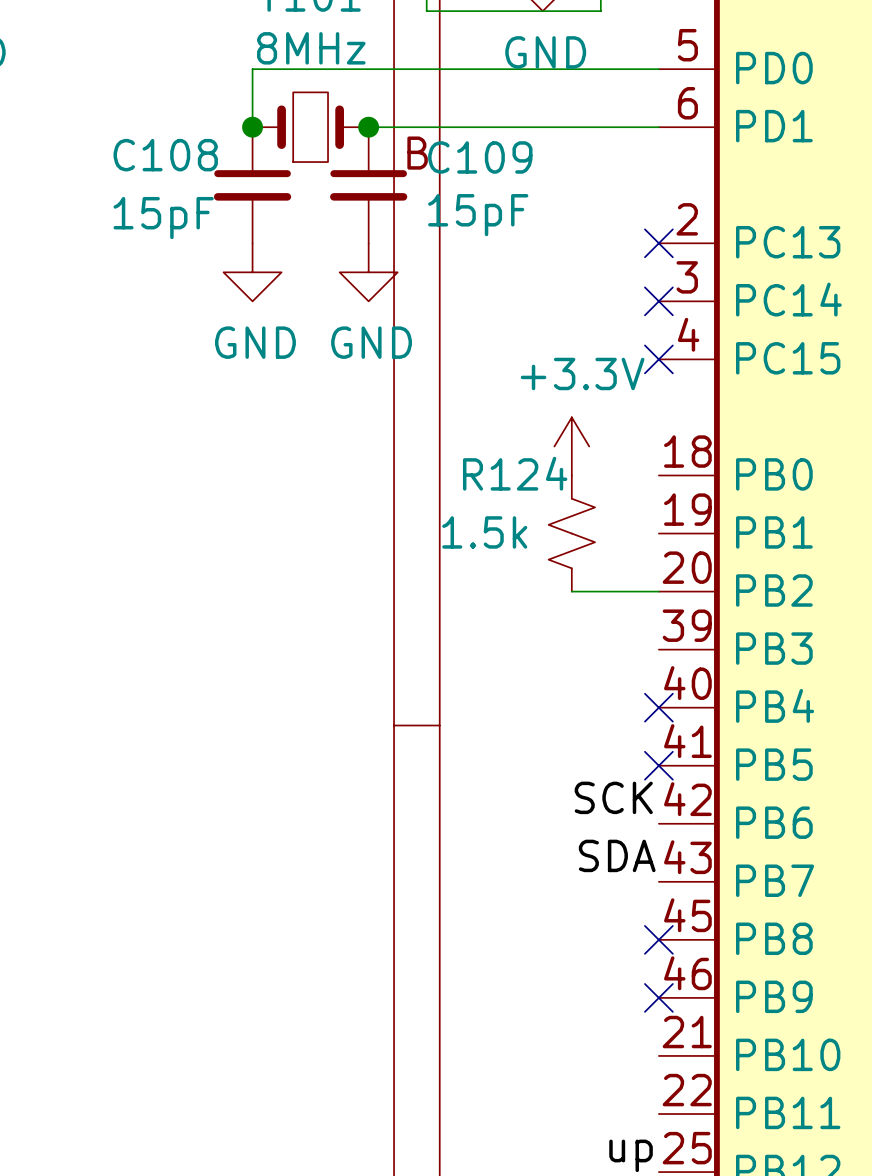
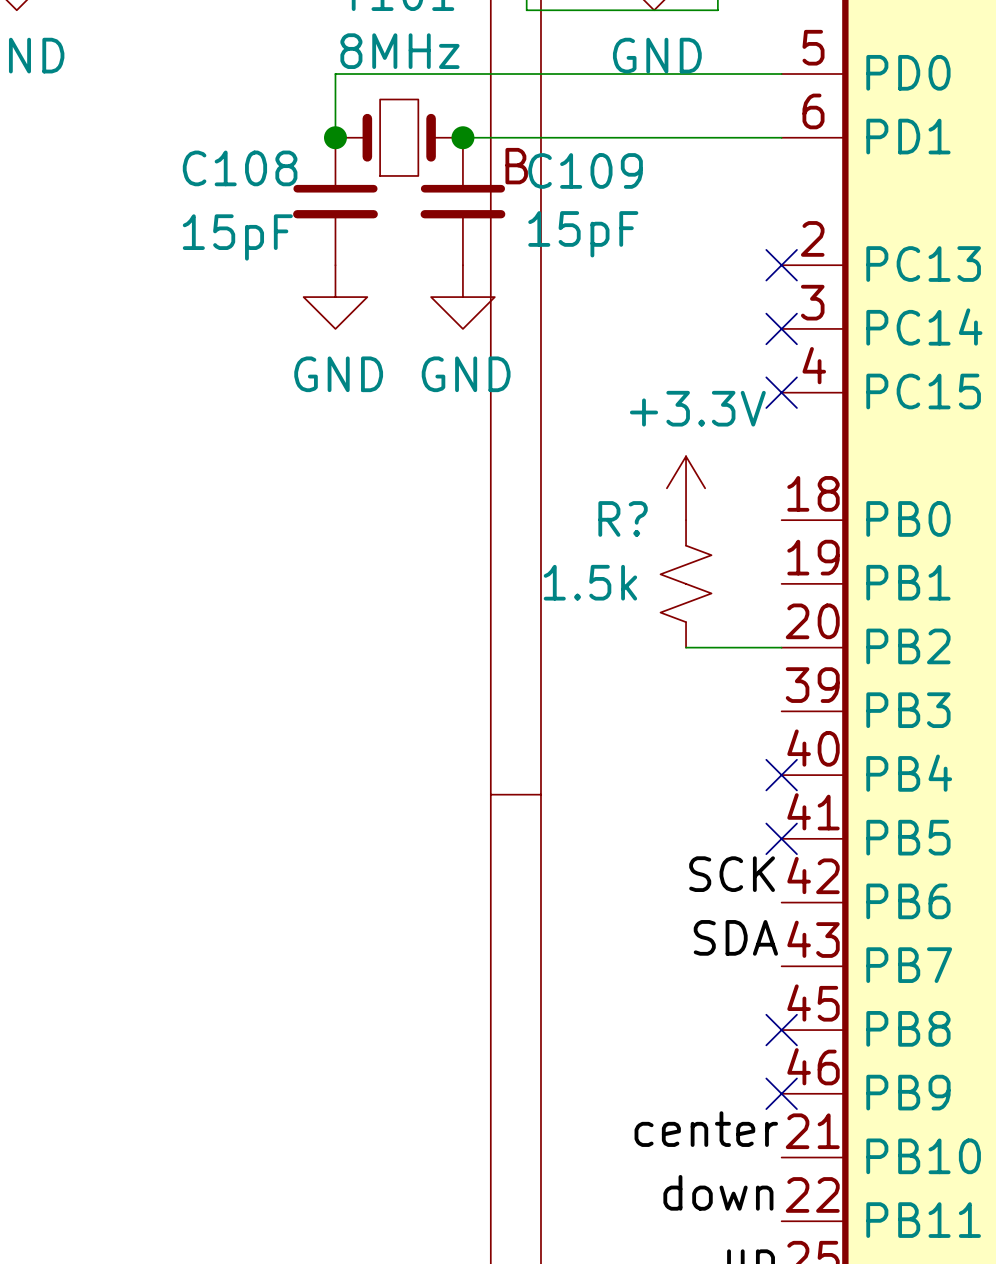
R124 name: R124 (515, 473) -> R? (623, 518)
label: none -> center (706, 1129)
label: none -> down (718, 1192)

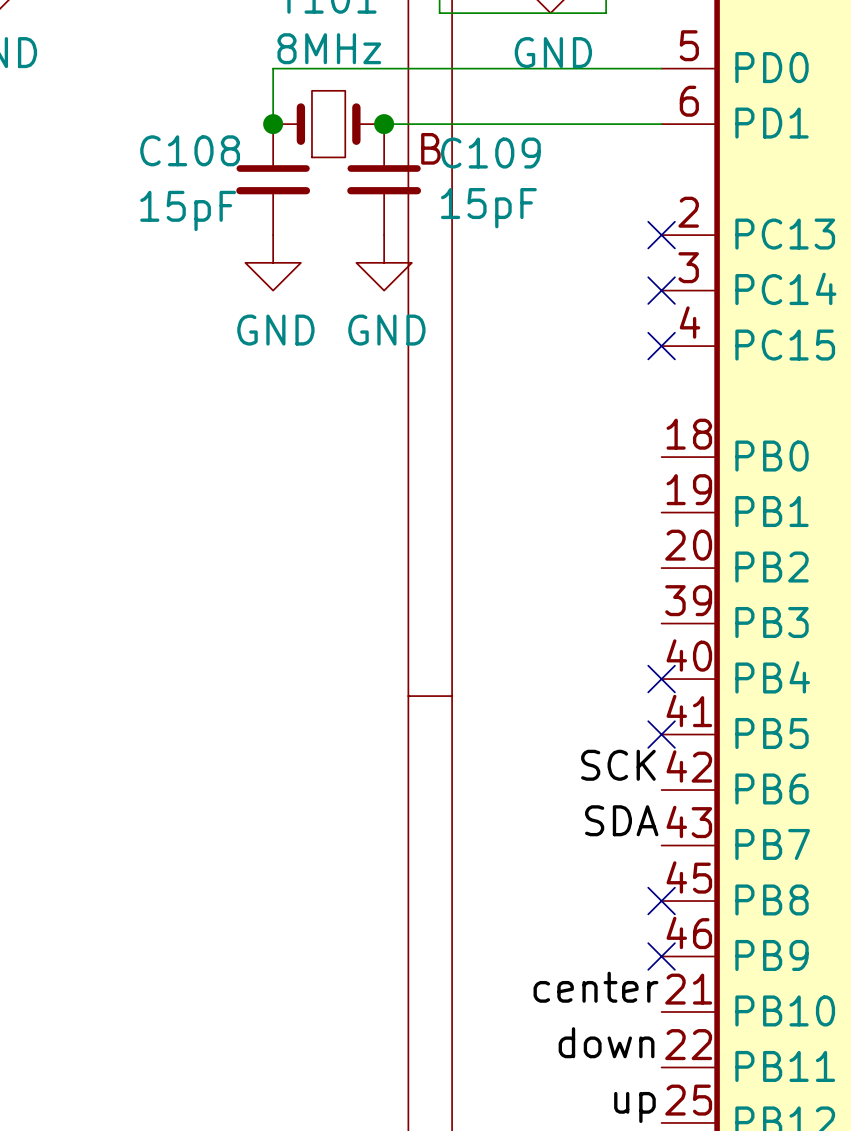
power symbol: +3.3V (686, 488) -> none
R?: 1.5k (686, 583) -> none
wire: (686, 647) (781, 647) -> none

